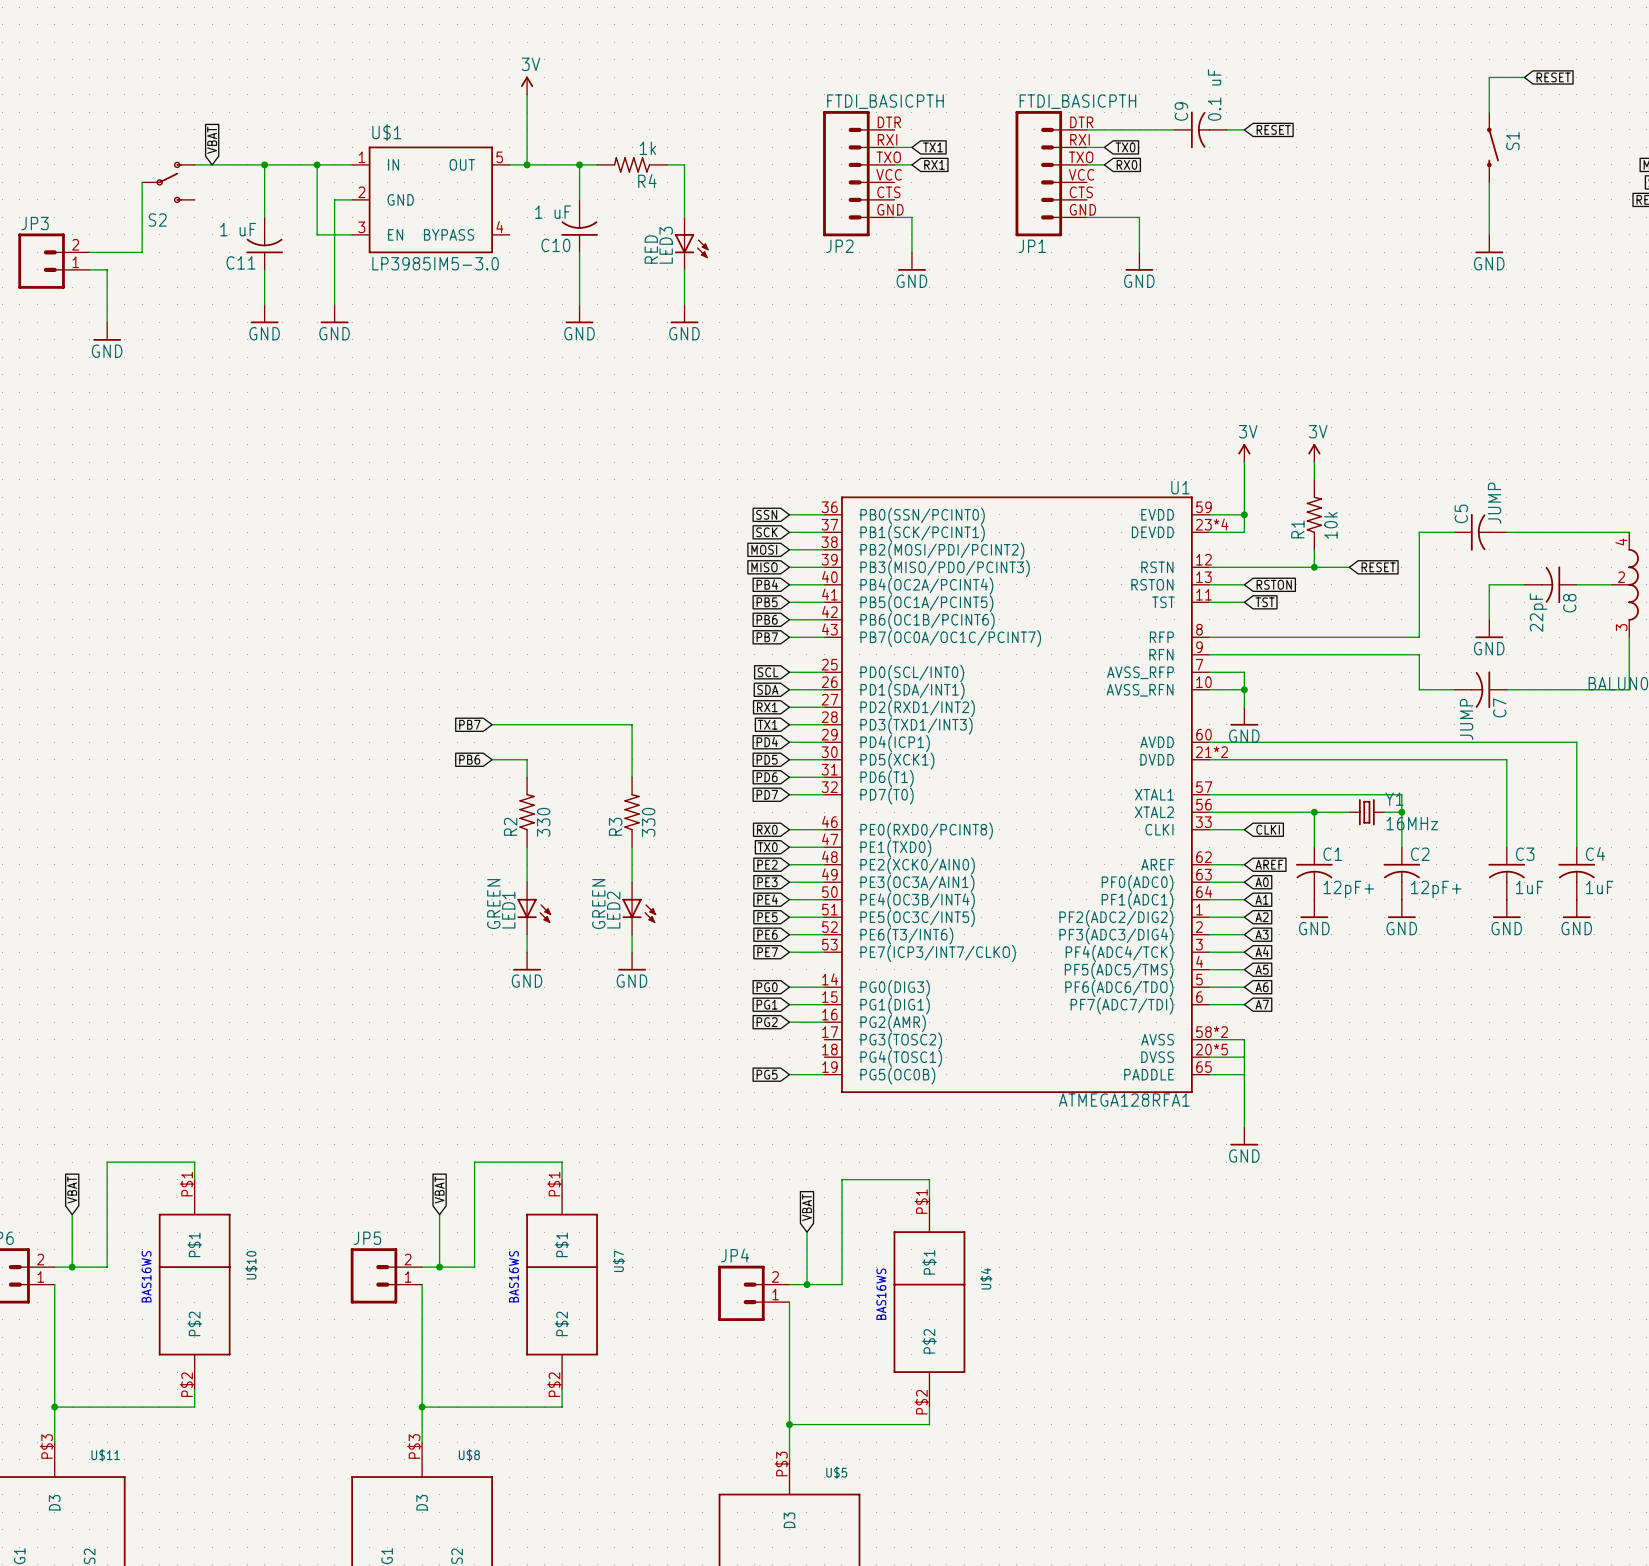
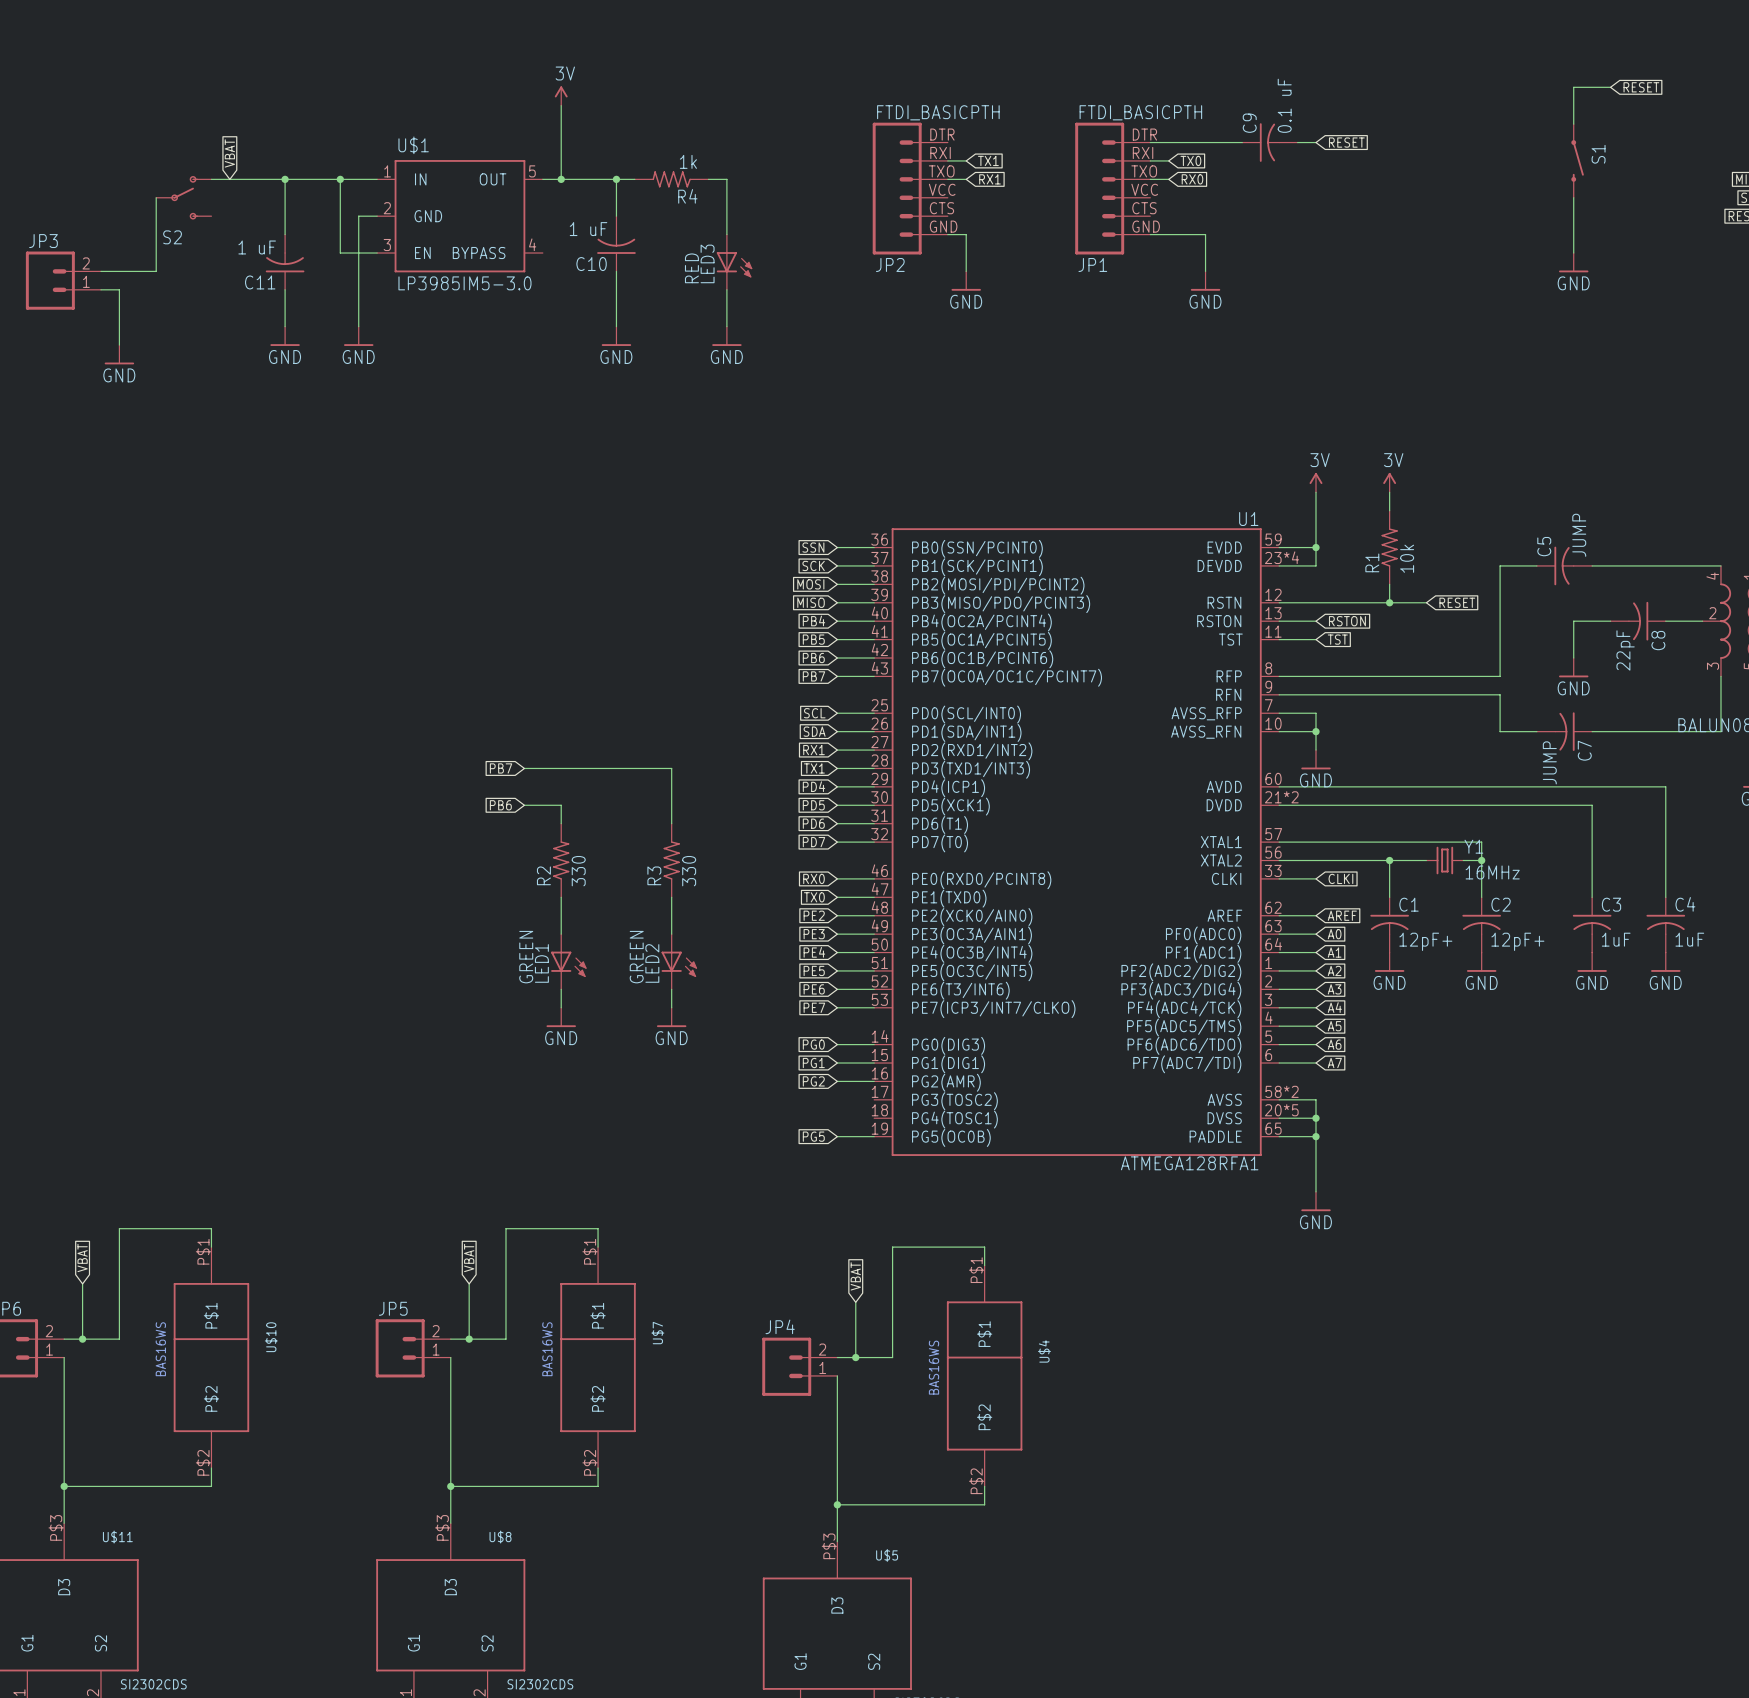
junction: none -> (1315, 1118)
junction: none -> (1315, 1136)

